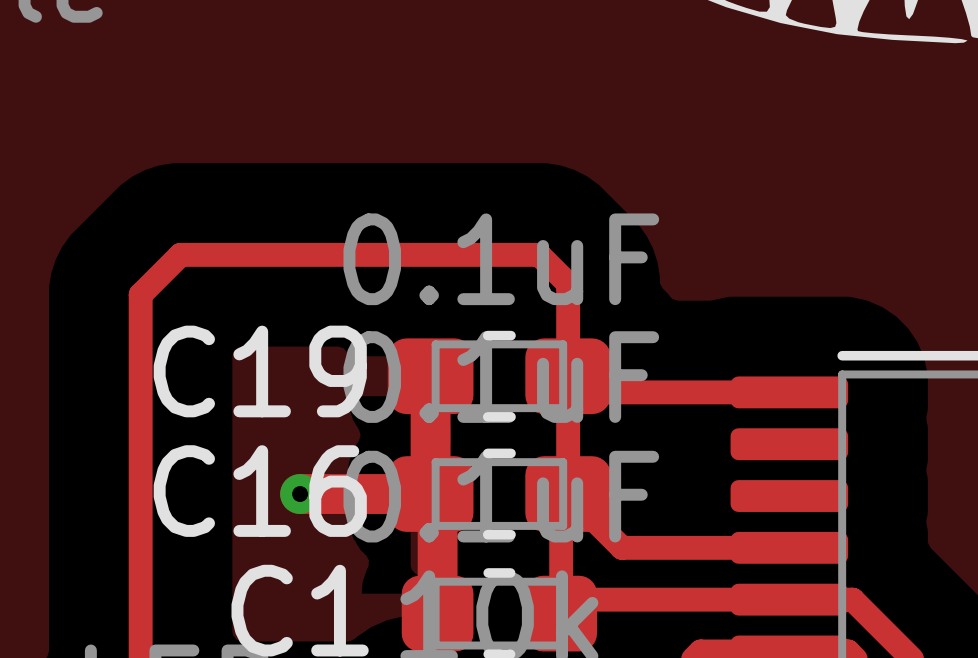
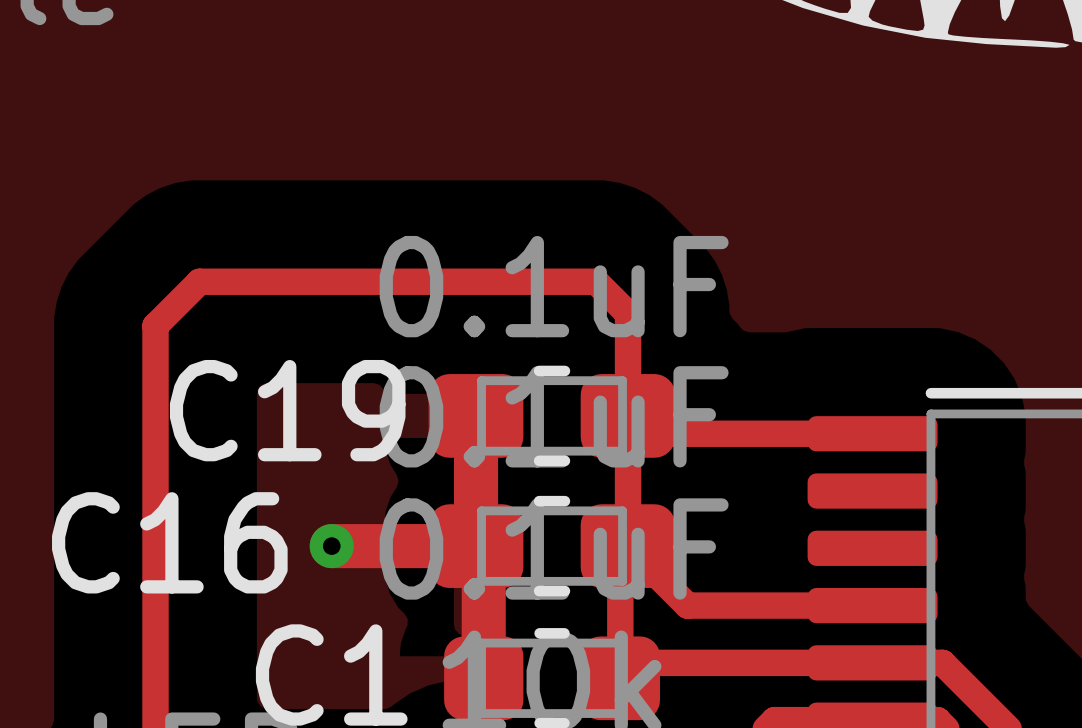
C16 name position: C16 (260, 491) -> C16 (169, 542)

